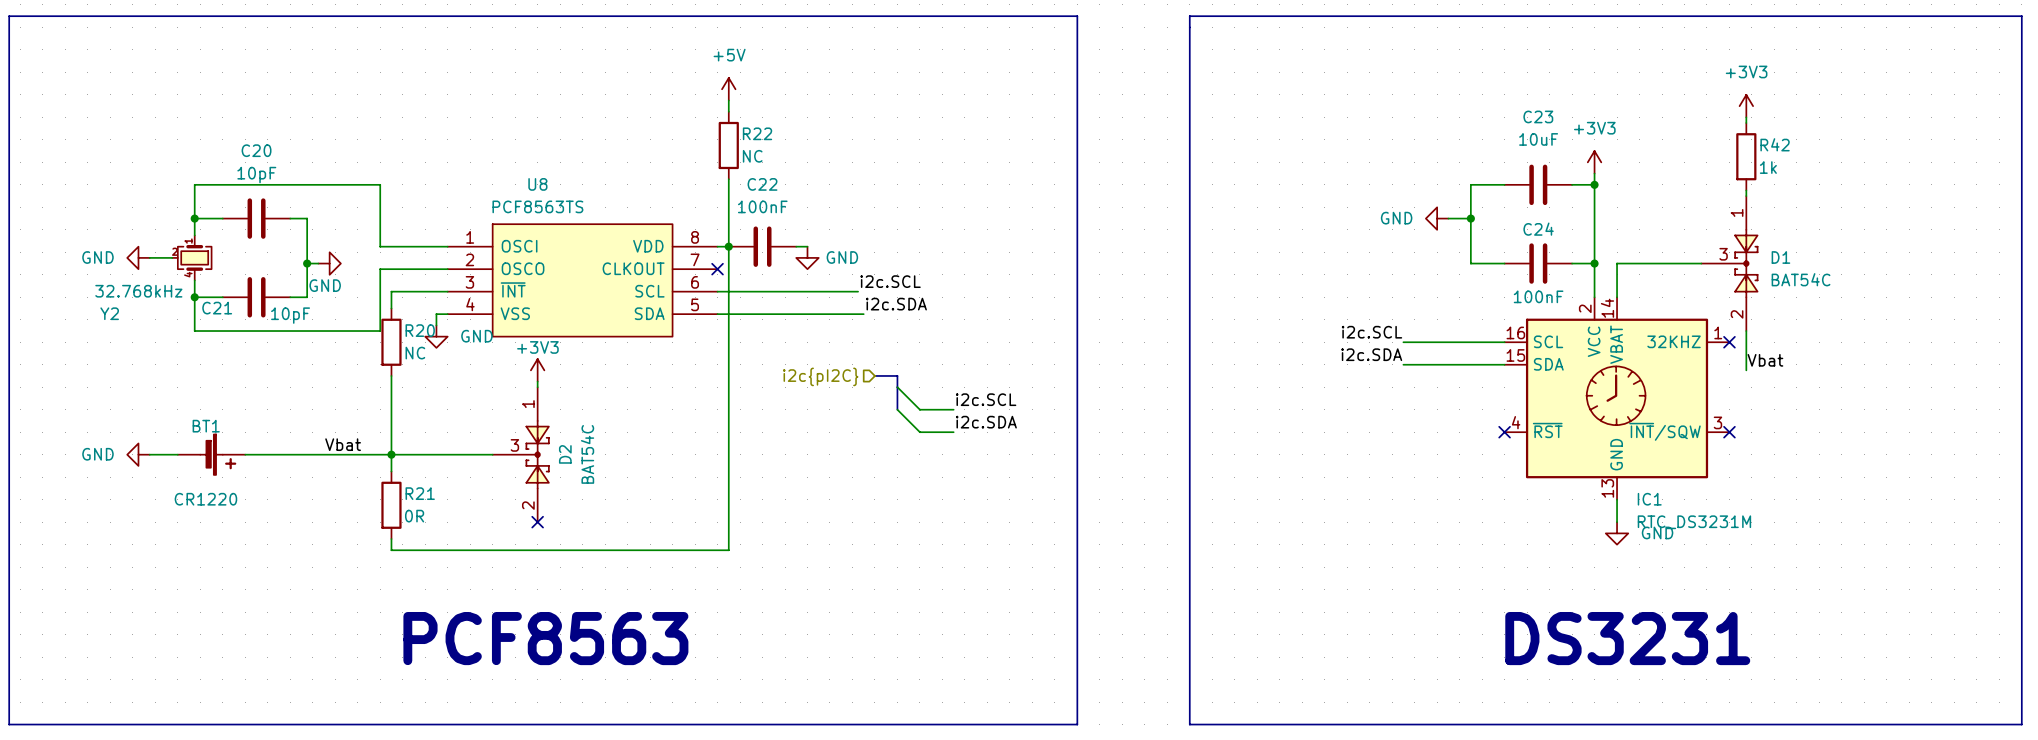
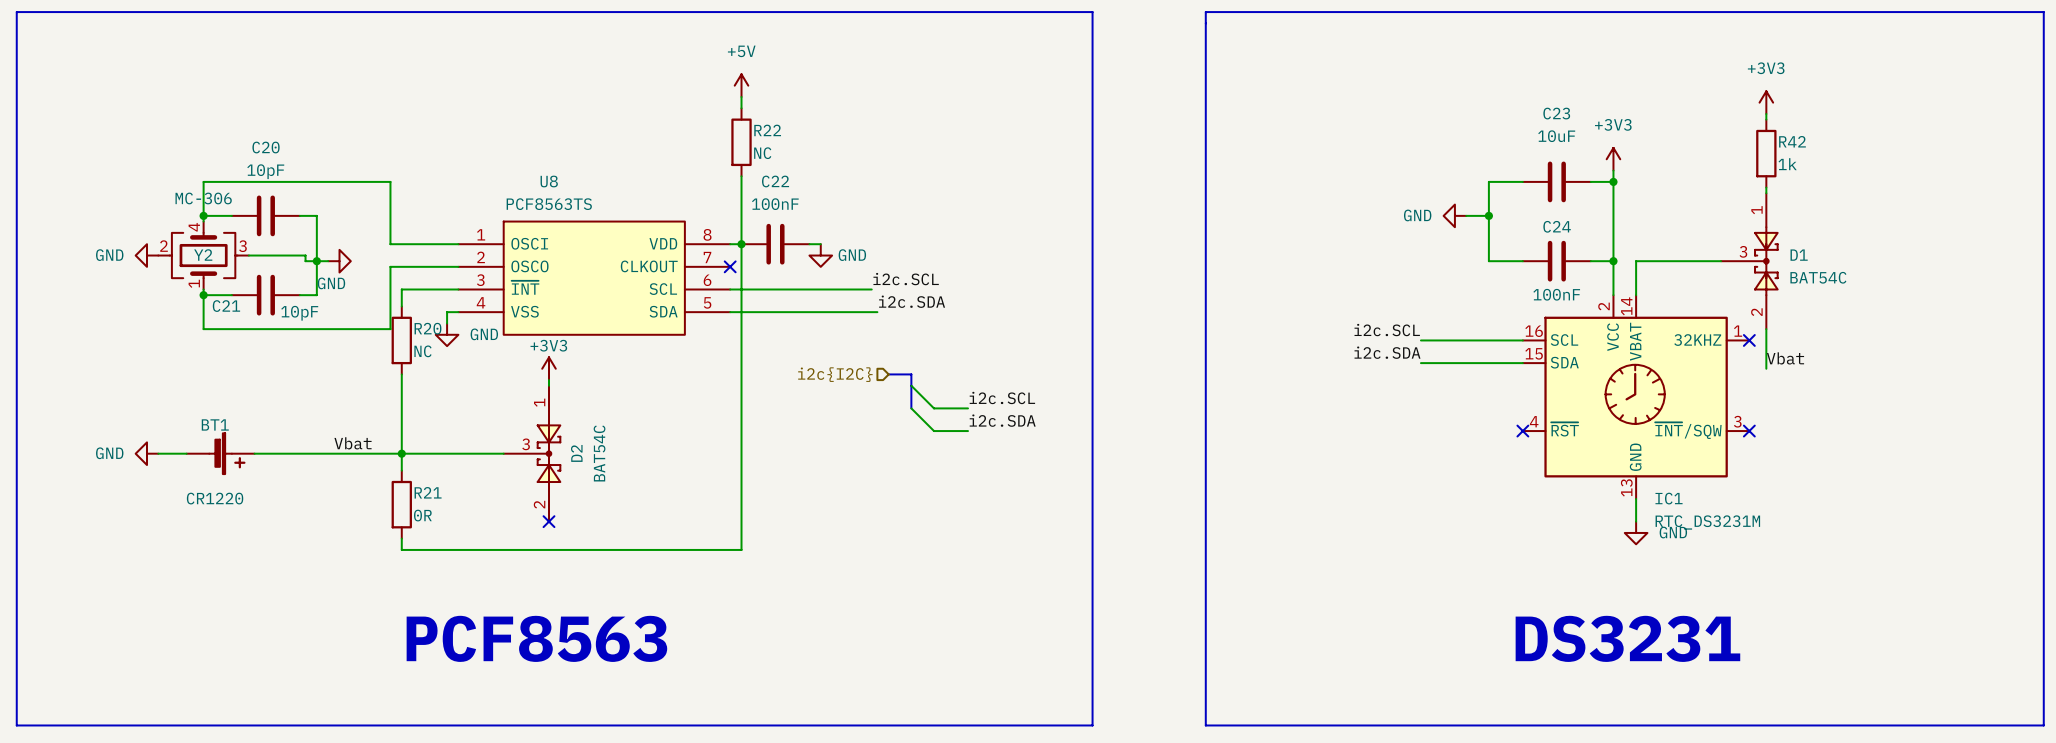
Y2 symbol: [172, 235, 212, 281] -> [158, 221, 249, 290]
wire: none -> (248, 255) (305, 255) (305, 261) (316, 261)
Y2 value: 32.768kHz (138, 291) -> MC-306 (203, 198)
Y2 name position: Y2 (109, 313) -> Y2 (203, 255)
hierarchical label: i2c{pI2C} (820, 376) -> i2c{I2C} (835, 374)

